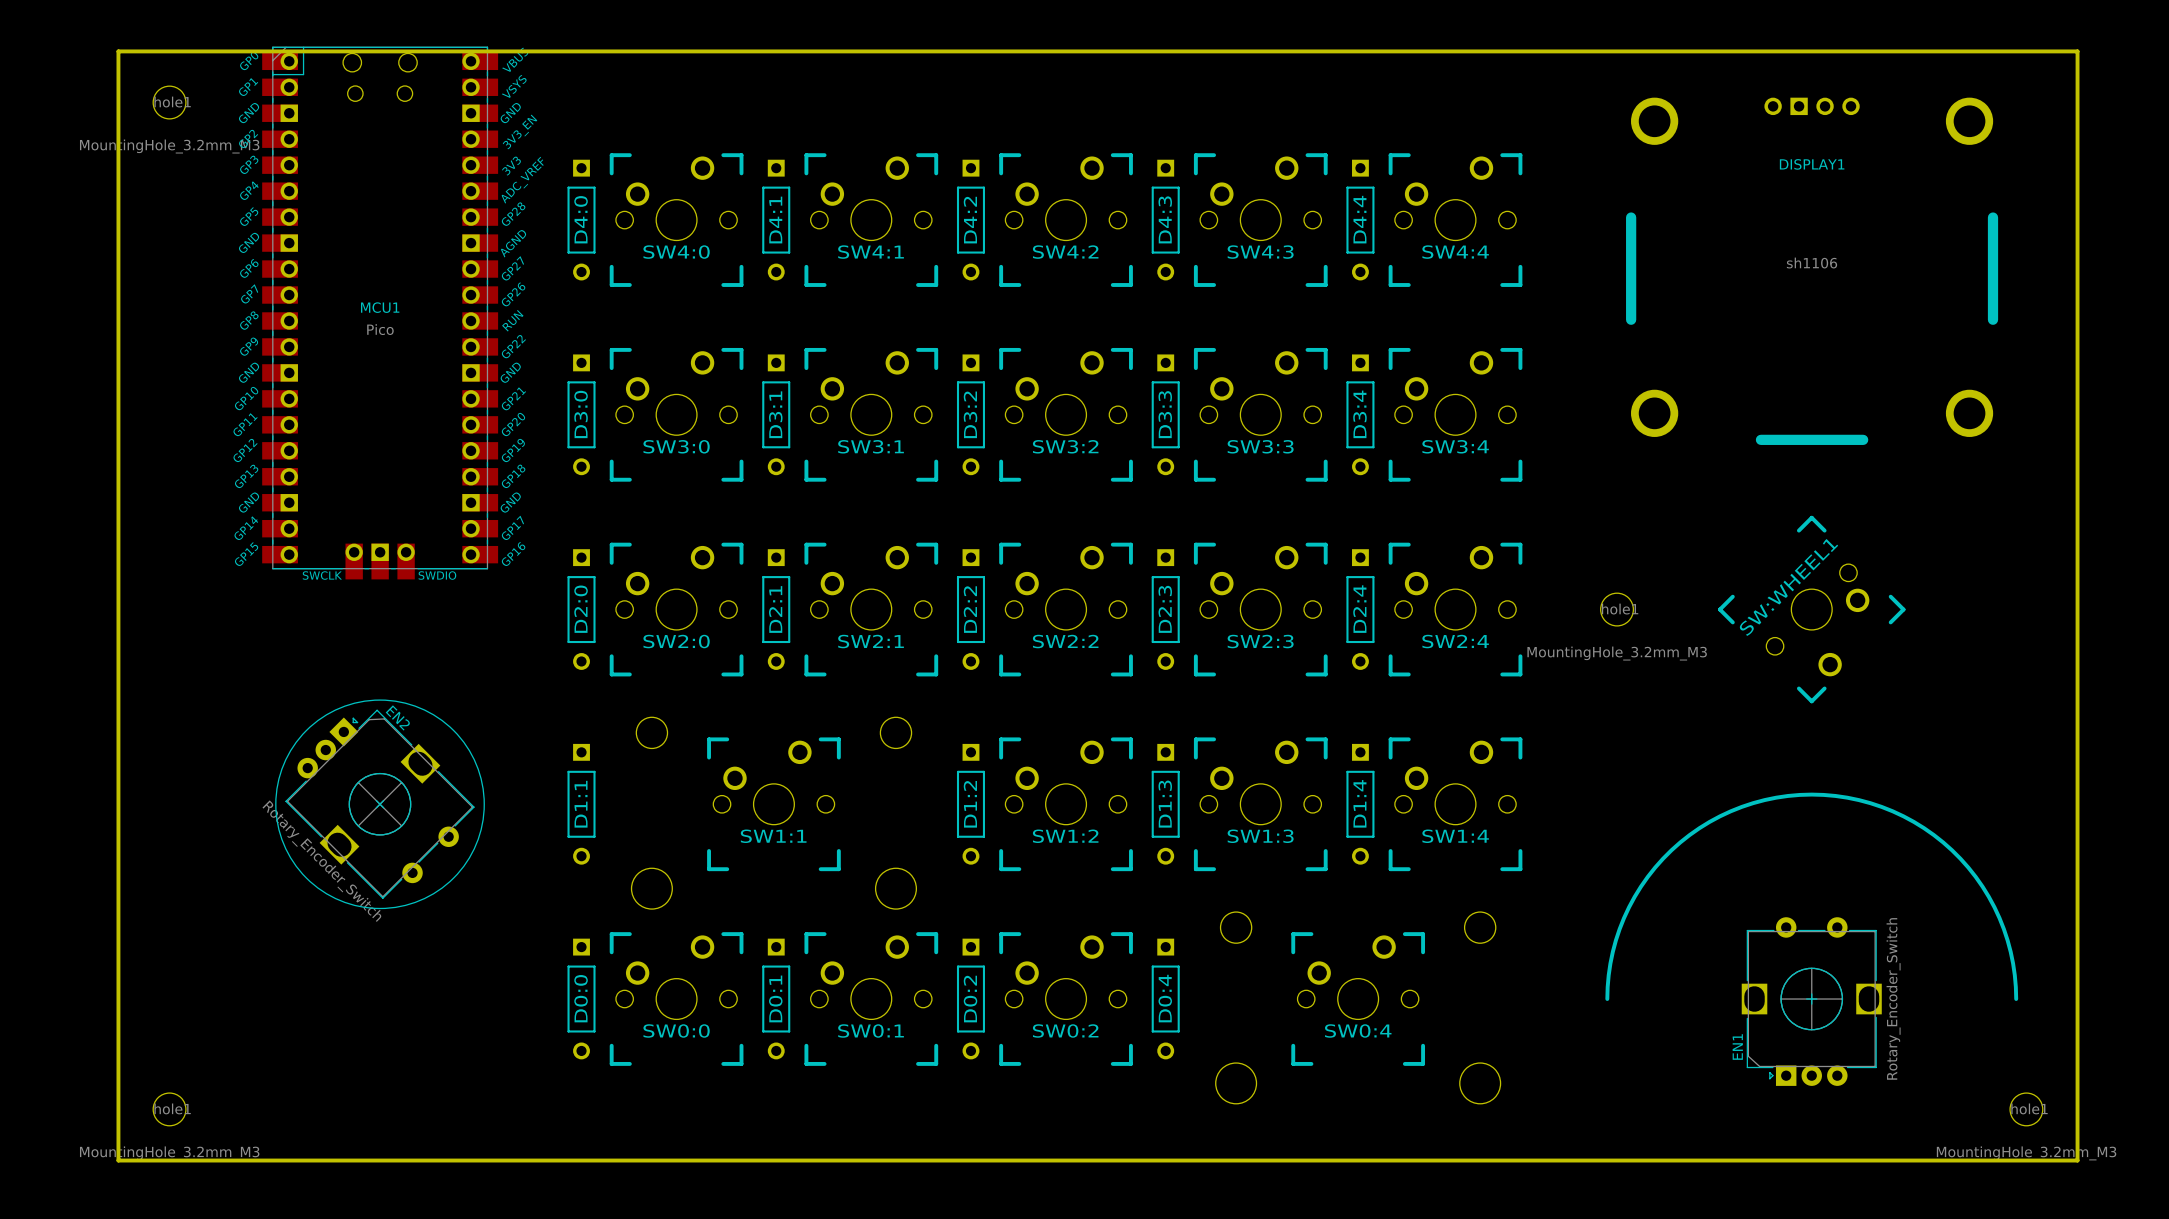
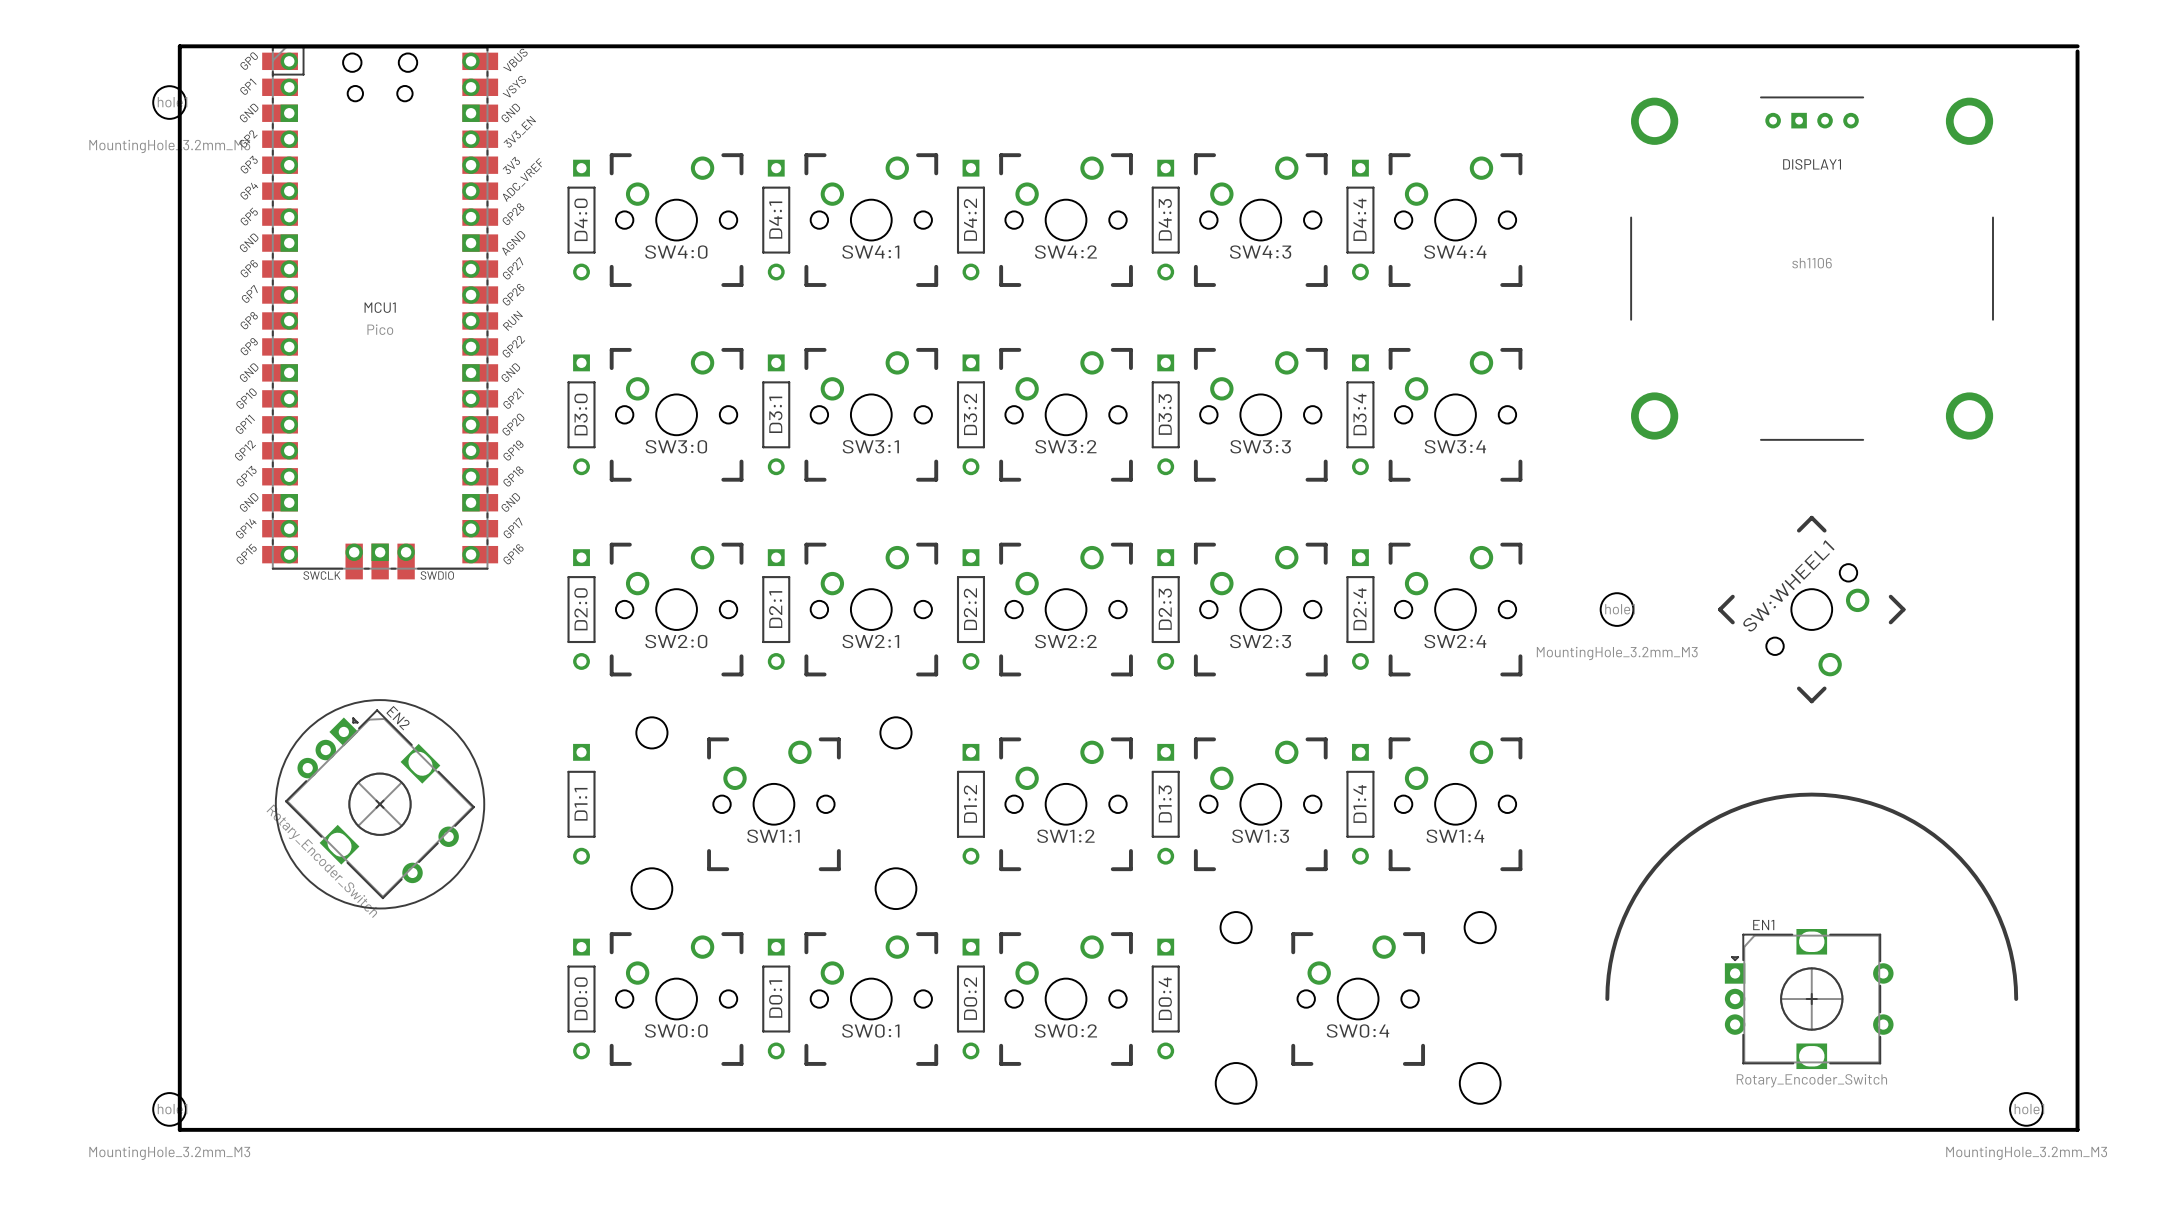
board edge: (2077, 51) (118, 51) (118, 1160) (2077, 1160) (2077, 1129) -> (2077, 46) (179, 46) (179, 1129) (2077, 1129)
DISPLAY1 footprint: [1626, 97, 1999, 445] -> [1630, 96, 1994, 441]
EN1 rotation: 0° (1811, 1001) -> 90° clockwise (1809, 999)

